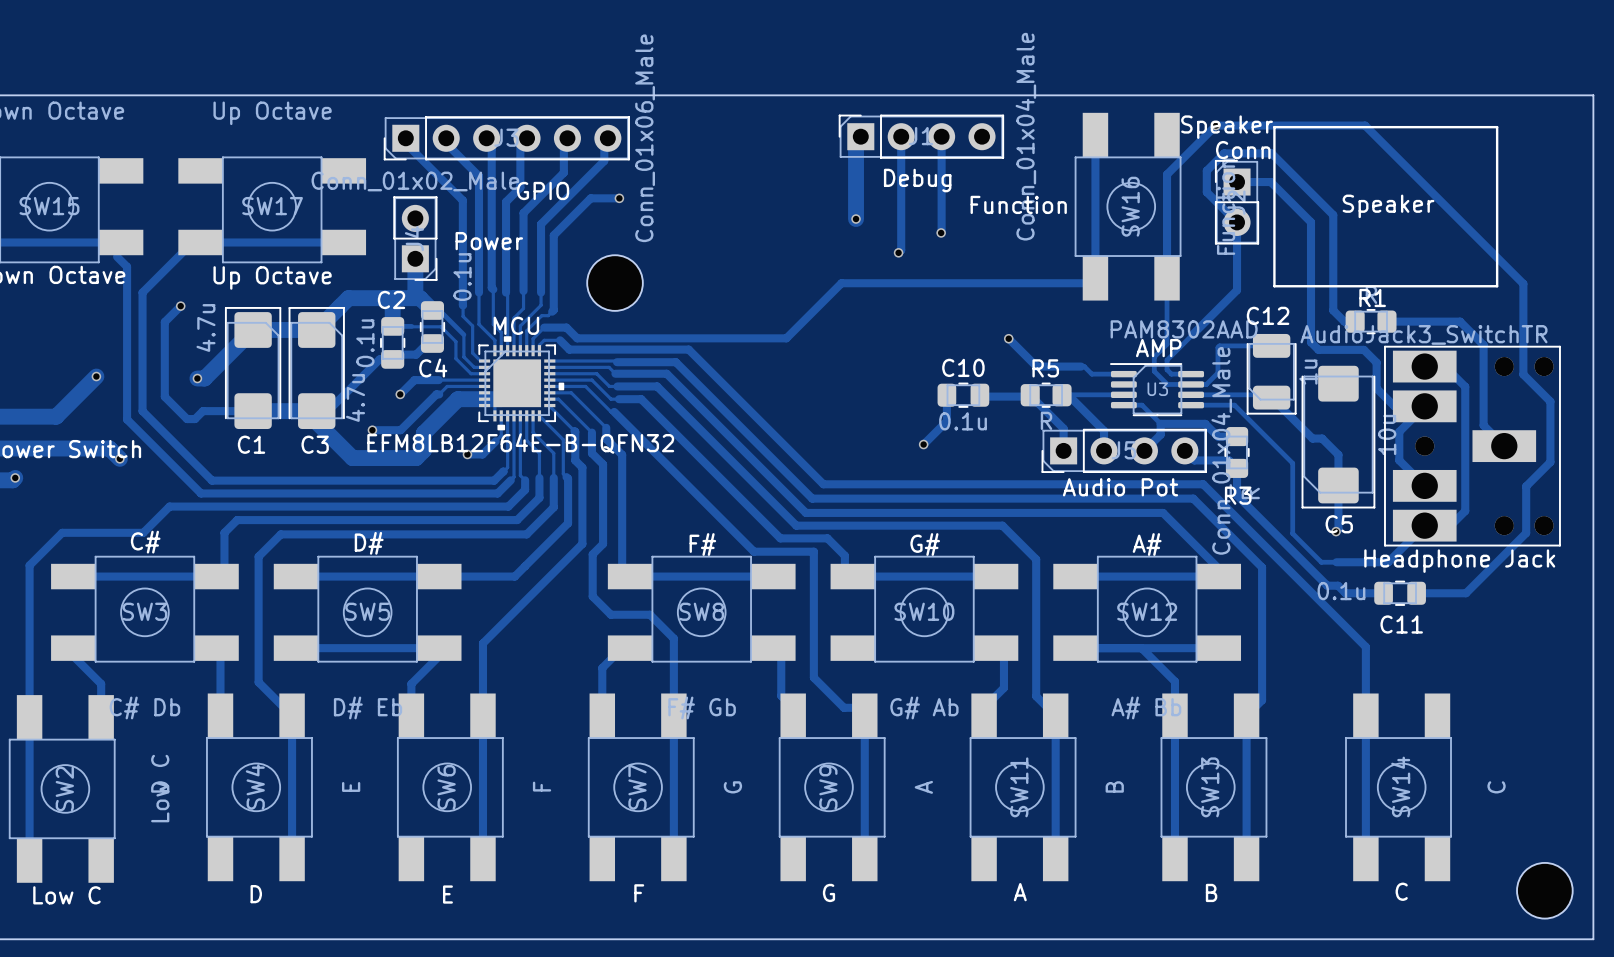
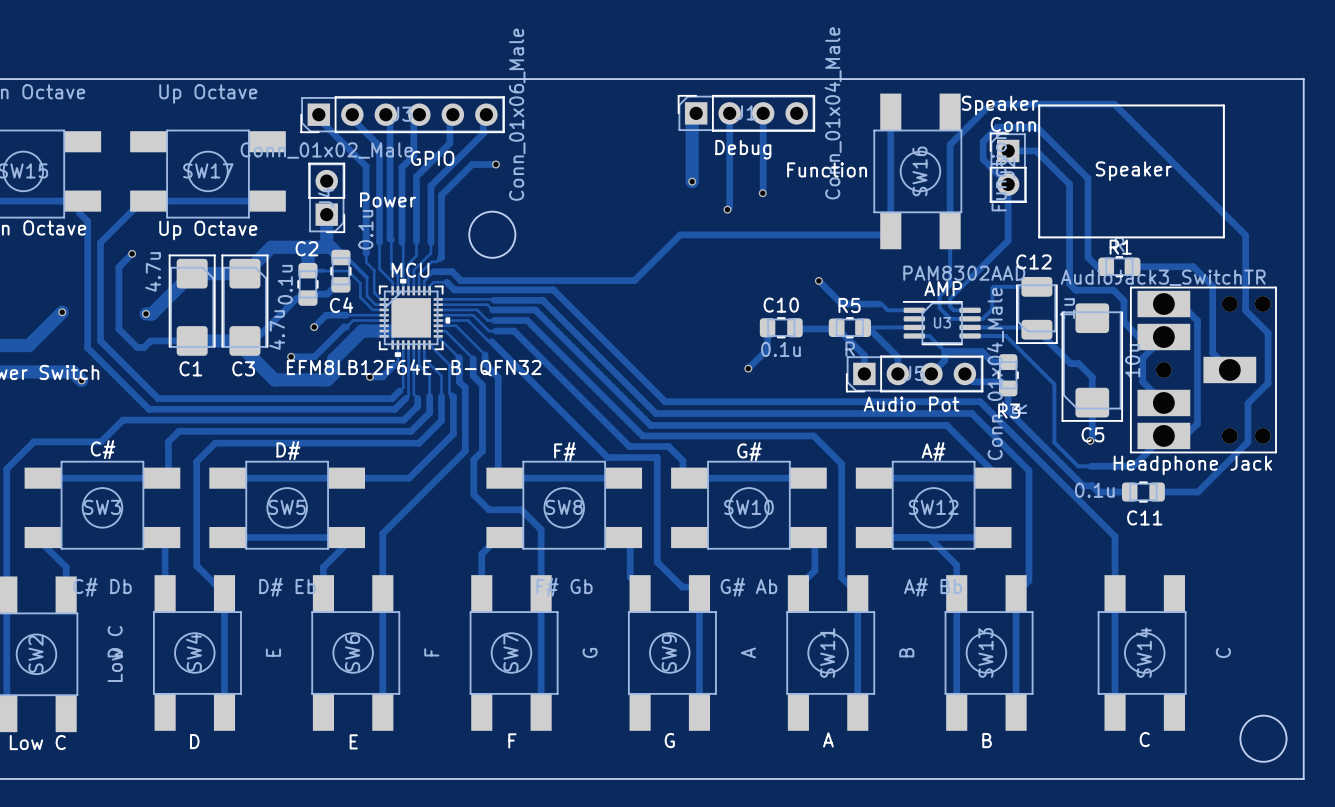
round board edge: none -> [468, 211, 517, 259]
part: (615, 283) -> none
round board edge: none -> [1239, 714, 1288, 763]
part: (1544, 890) -> none

